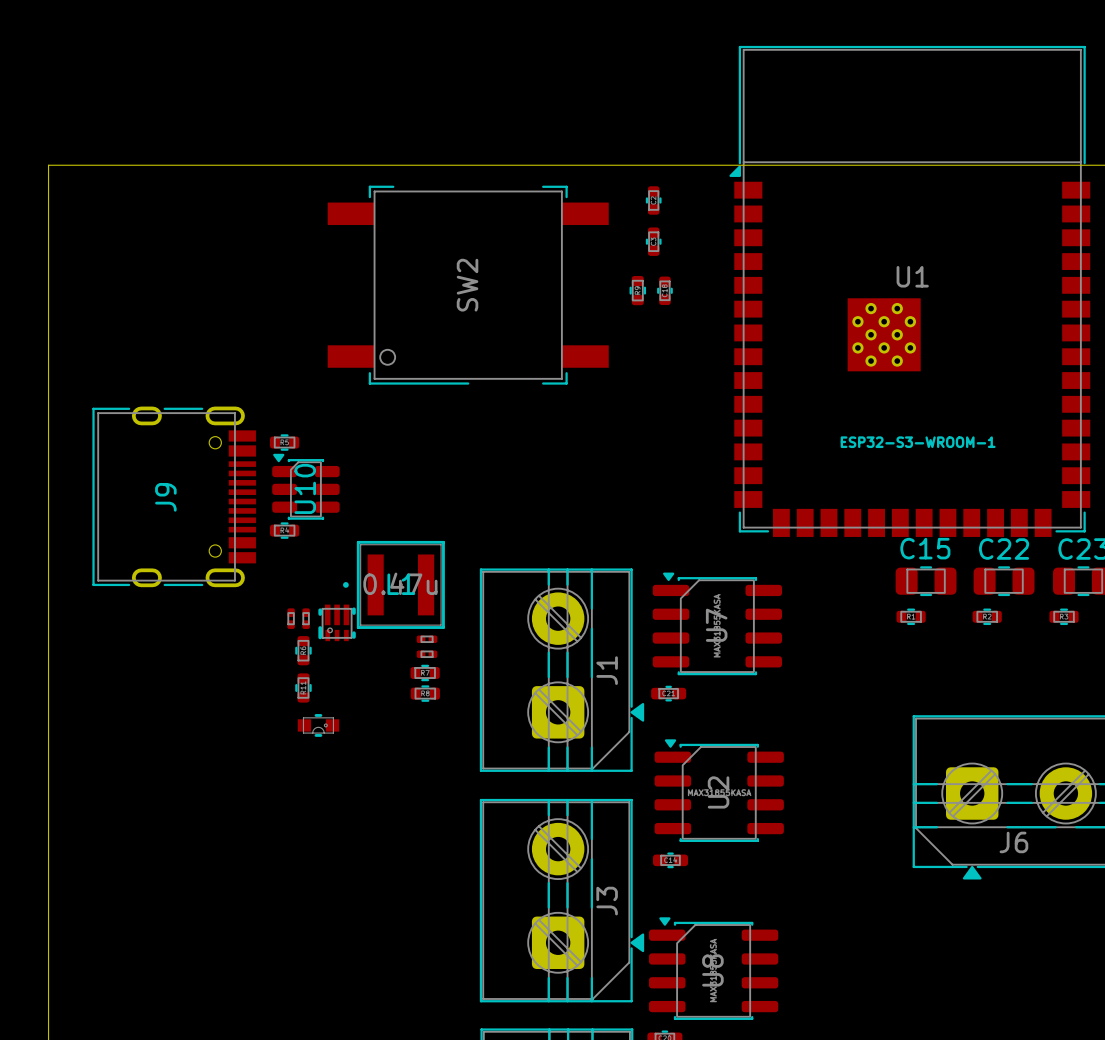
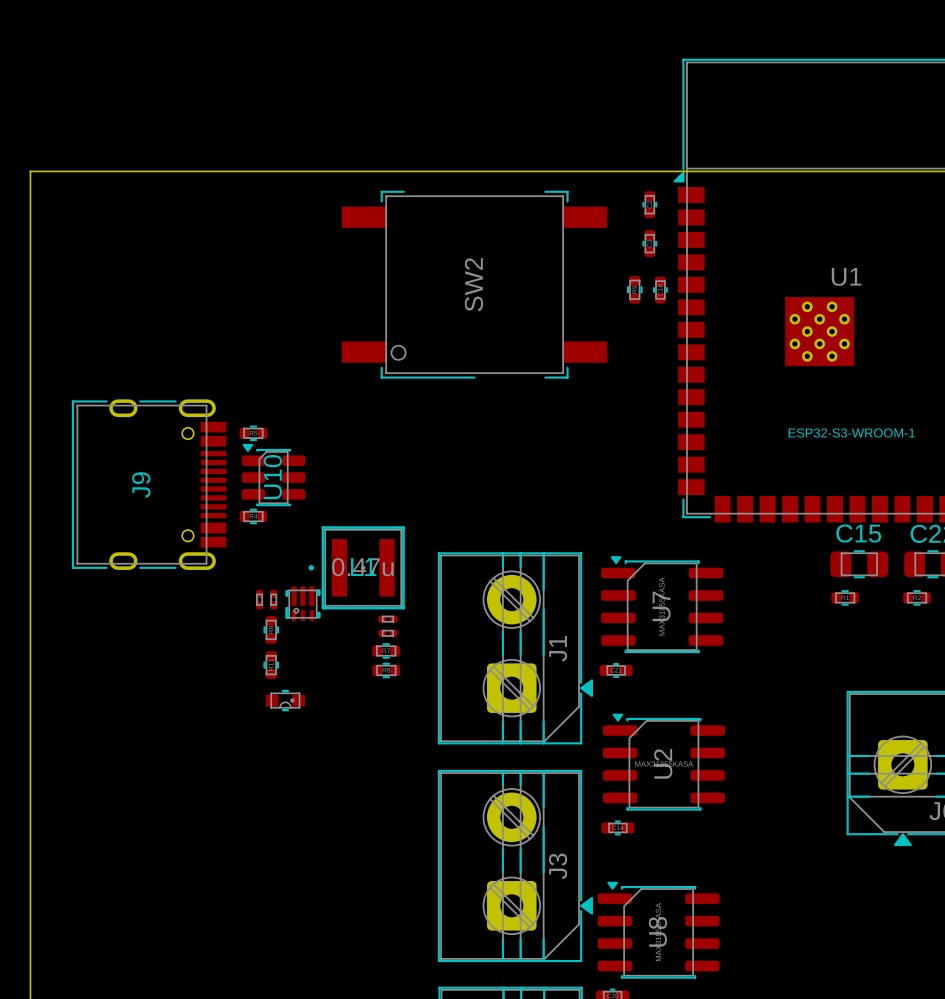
part position: (653, 200) -> (649, 204)
part position: (653, 241) -> (649, 243)
SW2 position: (468, 285) -> (474, 284)
part position: (637, 290) -> (634, 289)
part position: (664, 290) -> (660, 289)

